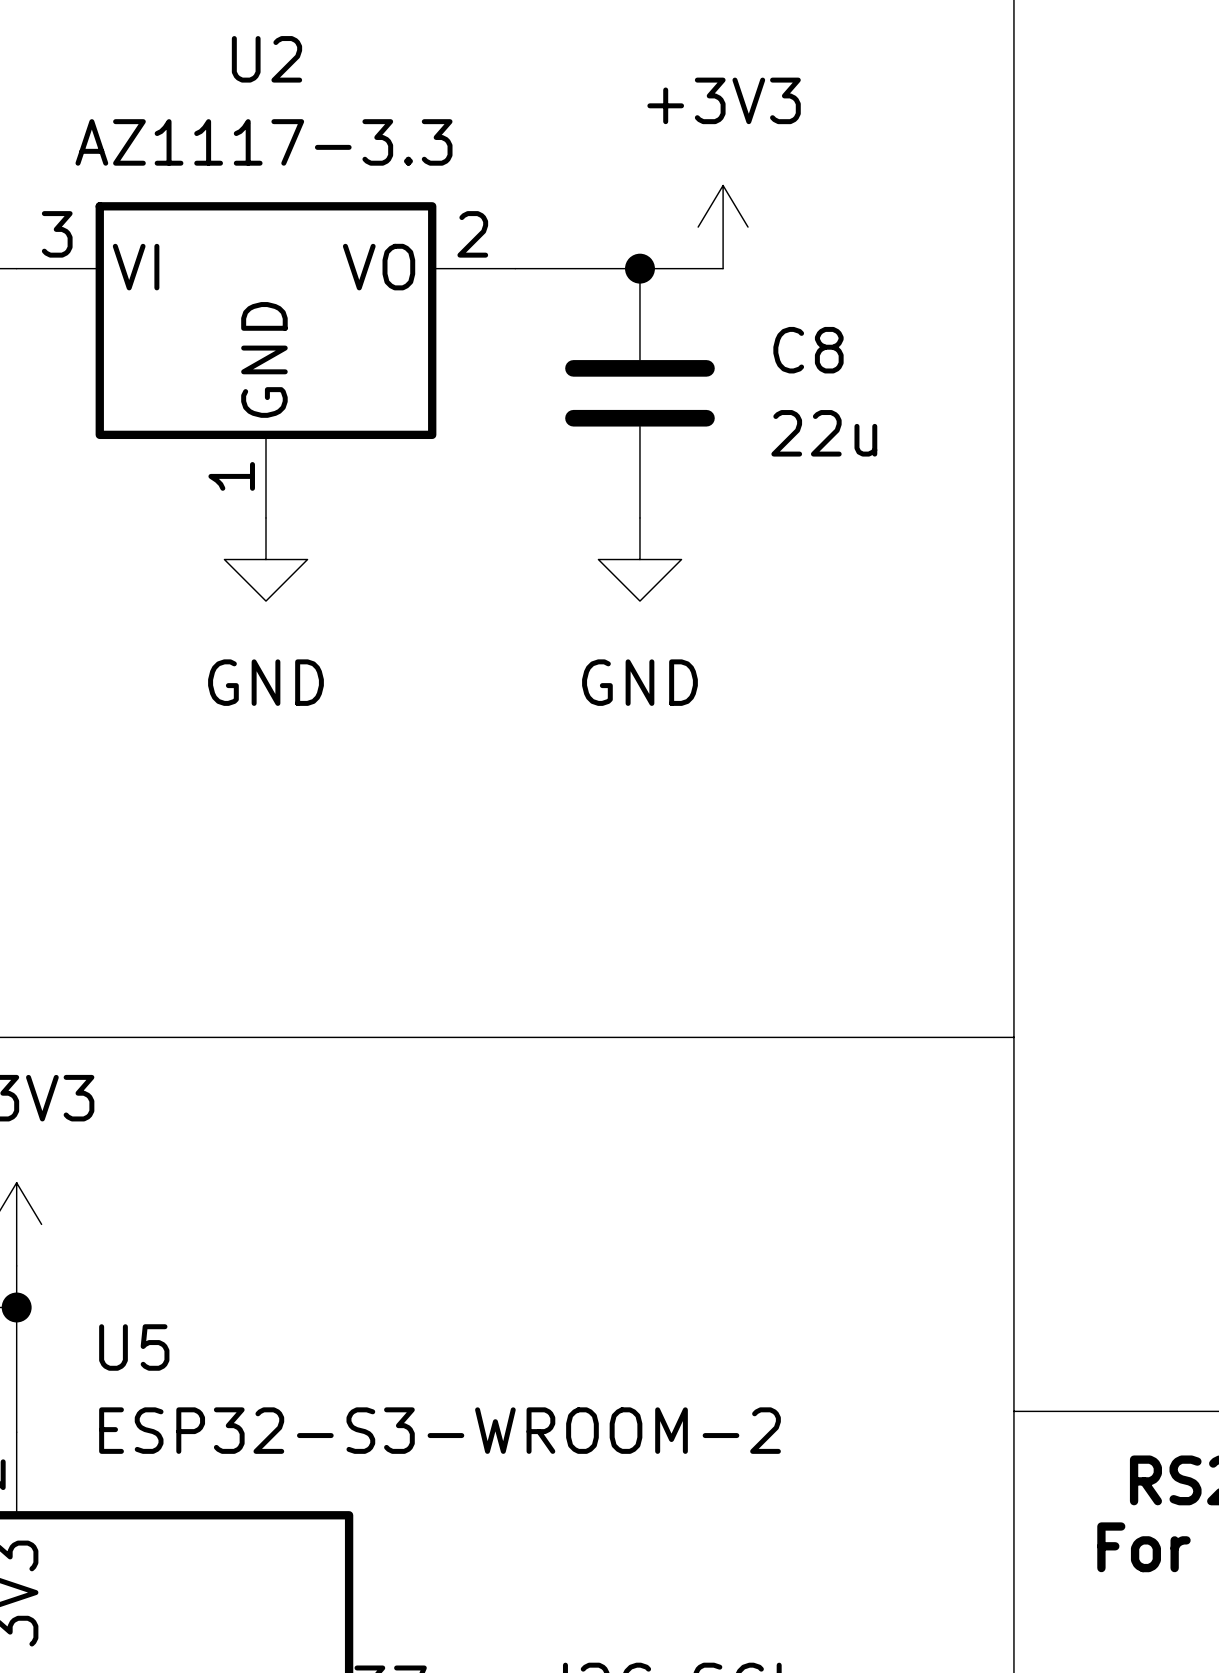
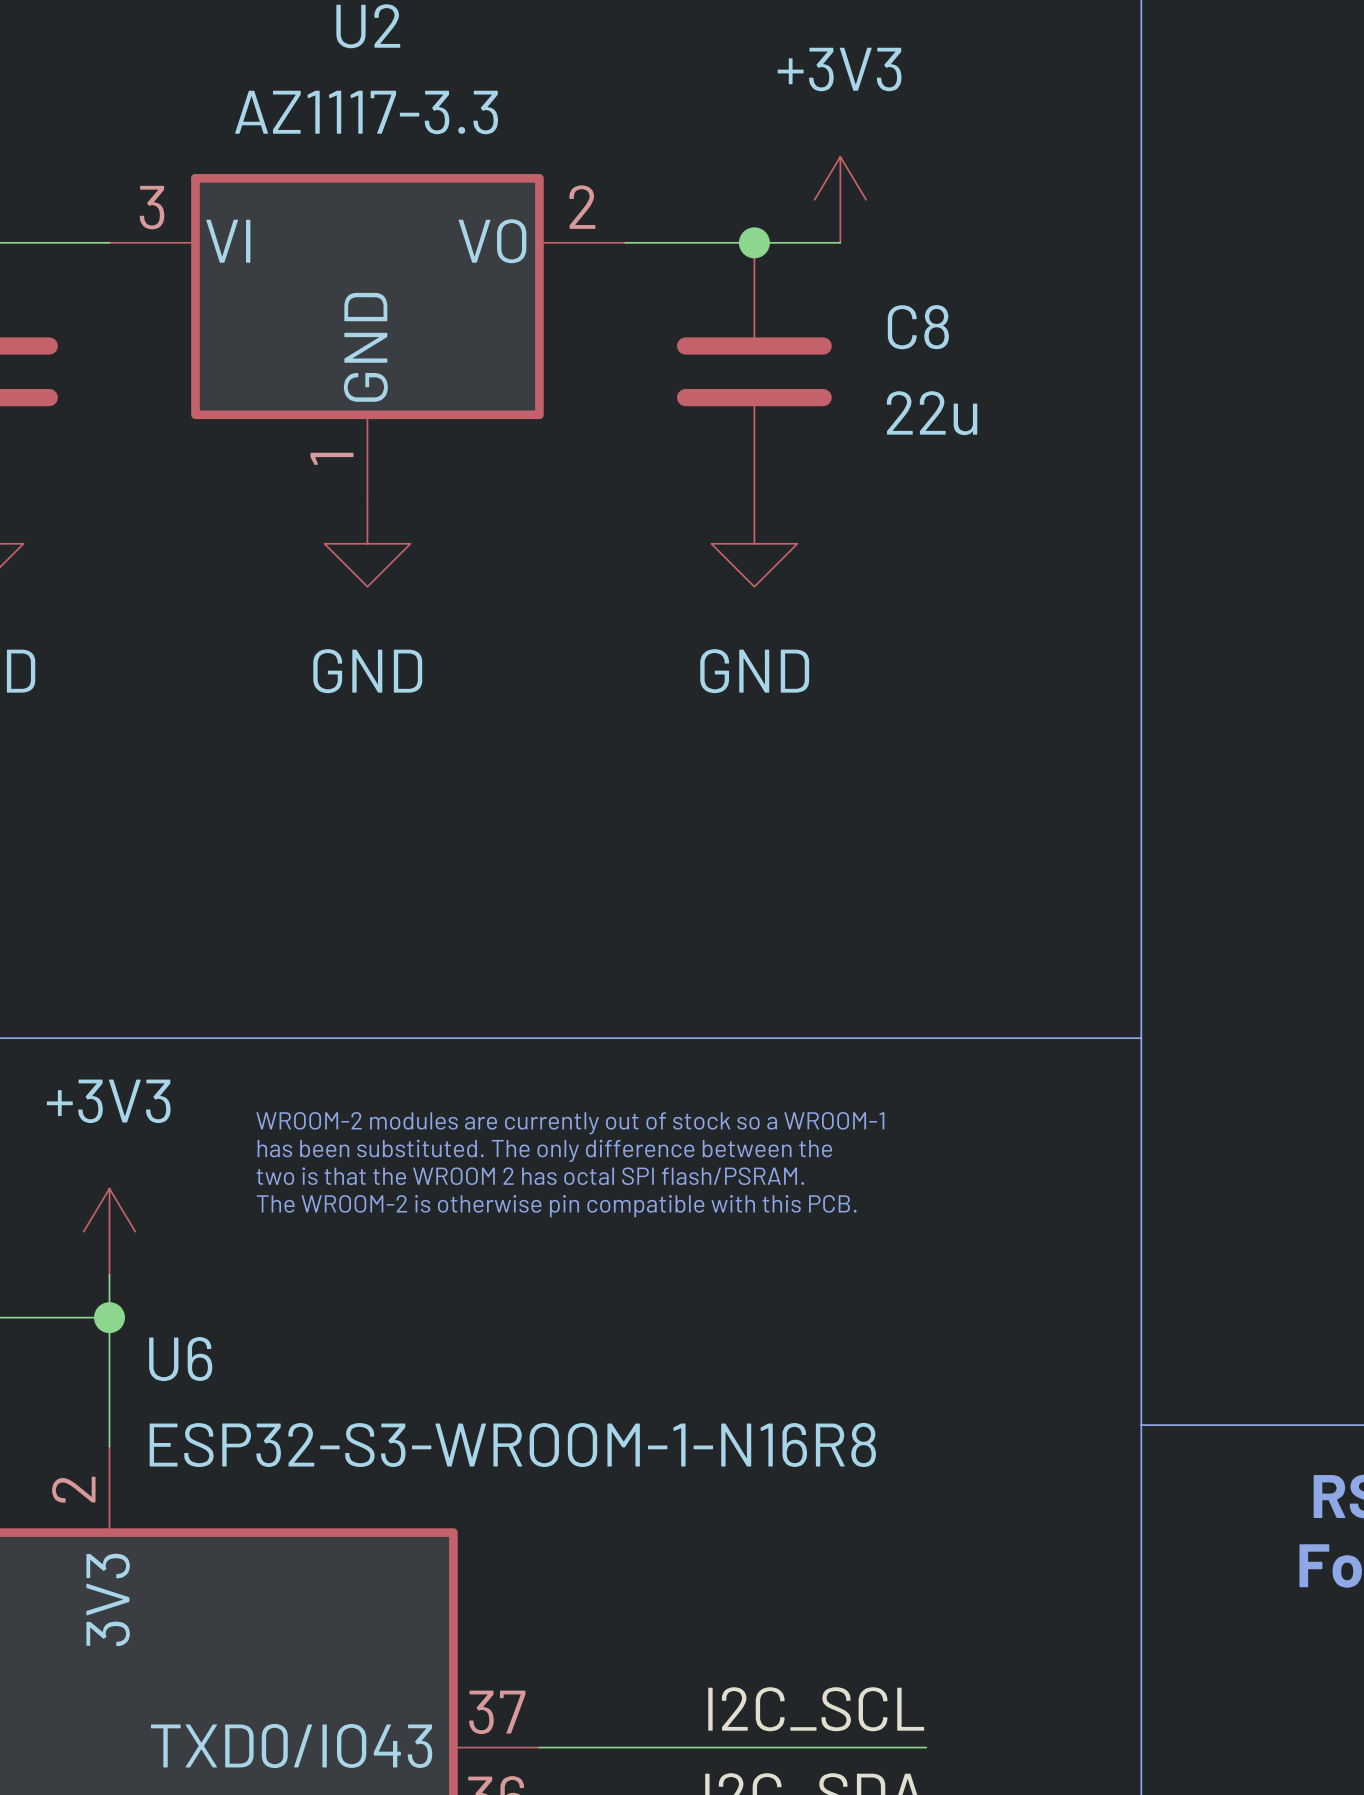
text: none -> WROOM-2 modules are currently out of stock so a WROOM-1 (570, 1123)
text: none -> has been substituted. The only difference between the (544, 1150)
text: none -> two is that the WROOM 2 has octal SPI flash/PSRAM. (530, 1176)
text: none -> The WROOM-2 is otherwise pin compatible with this PCB. (556, 1206)
U5 name: U5 (134, 1347) -> U6 (180, 1359)
U5 value: ESP32-S3-WROOM-2 (440, 1430) -> ESP32-S3-WROOM-1-N16R8 (512, 1444)

